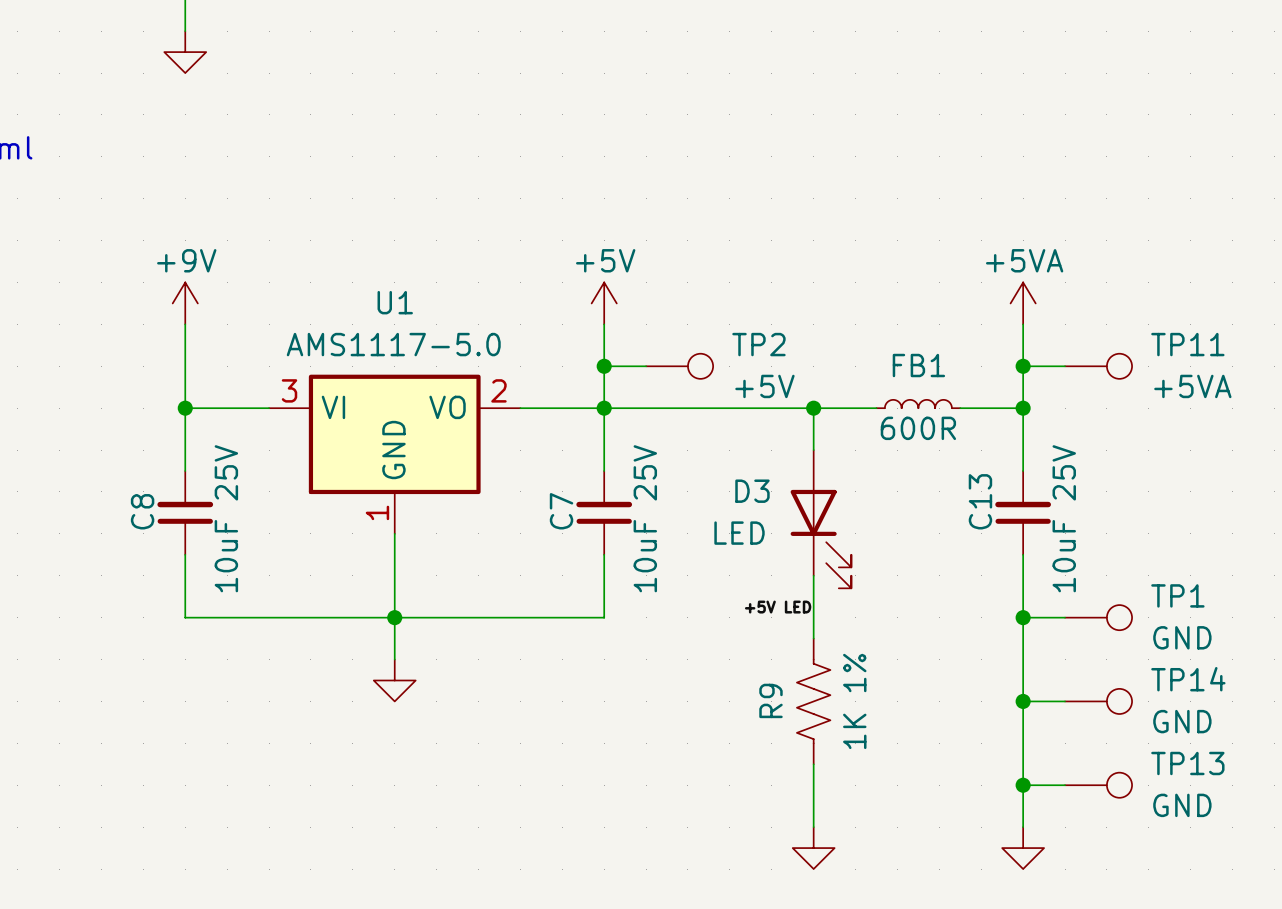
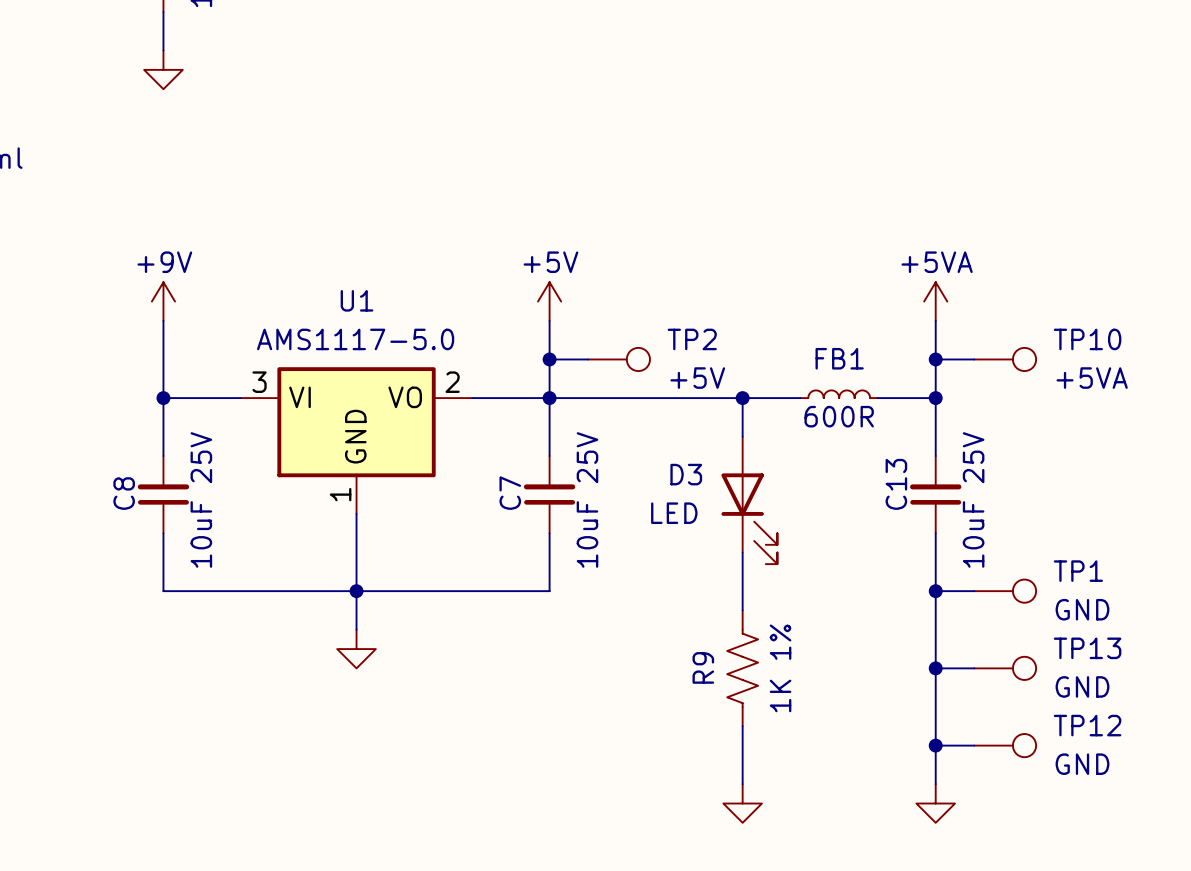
TP11 name: TP11 (1187, 344) -> TP10 (1087, 339)
label: +5V LED (778, 607) -> none
TP14 name: TP14 (1188, 679) -> TP13 (1087, 648)
TP13 name: TP13 (1187, 763) -> TP12 (1087, 725)

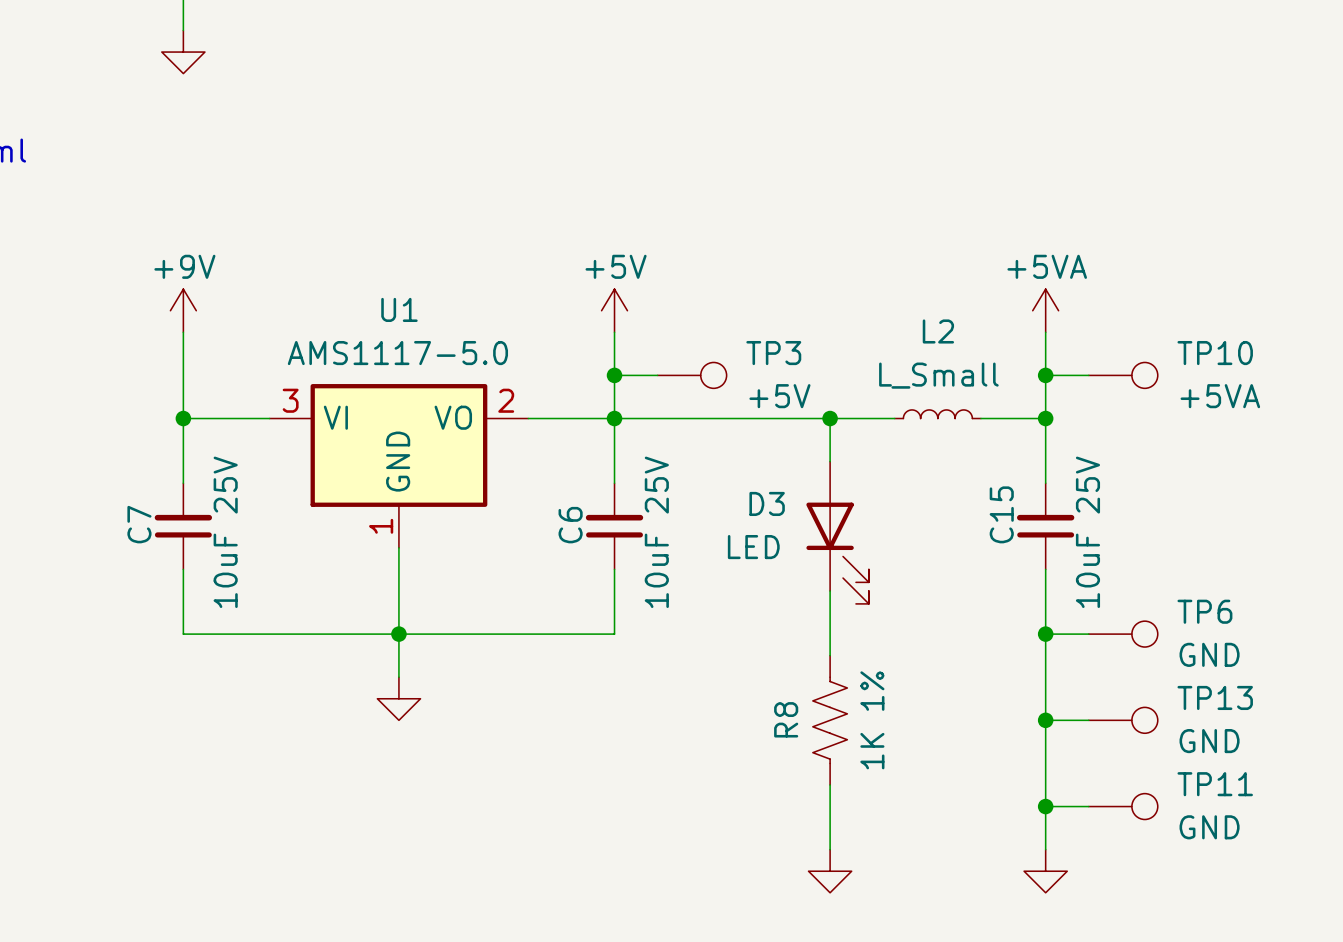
TP2 name: TP2 (692, 339) -> TP3 (773, 353)
FB1 name: FB1 (839, 358) -> L2 (938, 331)
FB1 value: 600R (839, 416) -> L_Small (938, 375)
C13 name: C13 (896, 484) -> C15 (1001, 514)
C8 name: C8 (124, 493) -> C7 (139, 524)
C7 name: C7 (510, 493) -> C6 (570, 525)
TP1 name: TP1 (1078, 571) -> TP6 (1204, 611)
R9 name: R9 (703, 667) -> R8 (786, 719)
TP12 name: TP12 (1087, 725) -> TP11 (1215, 784)

